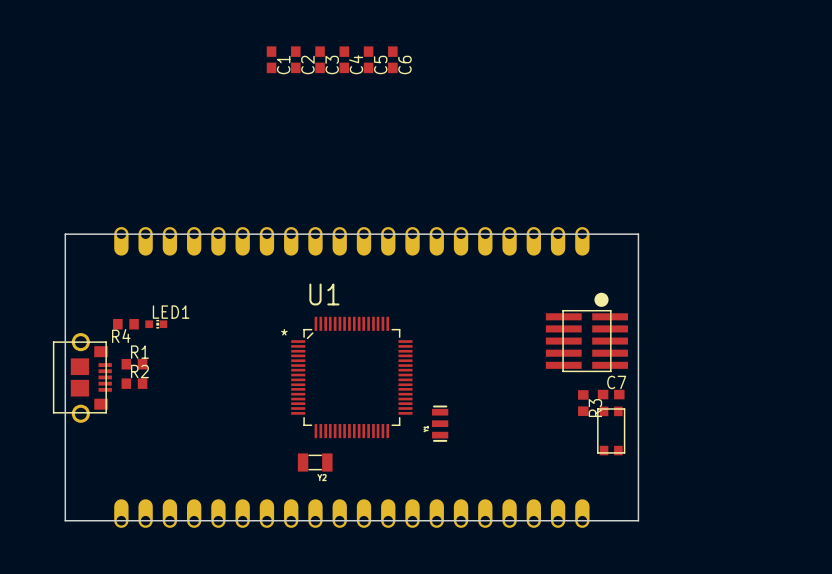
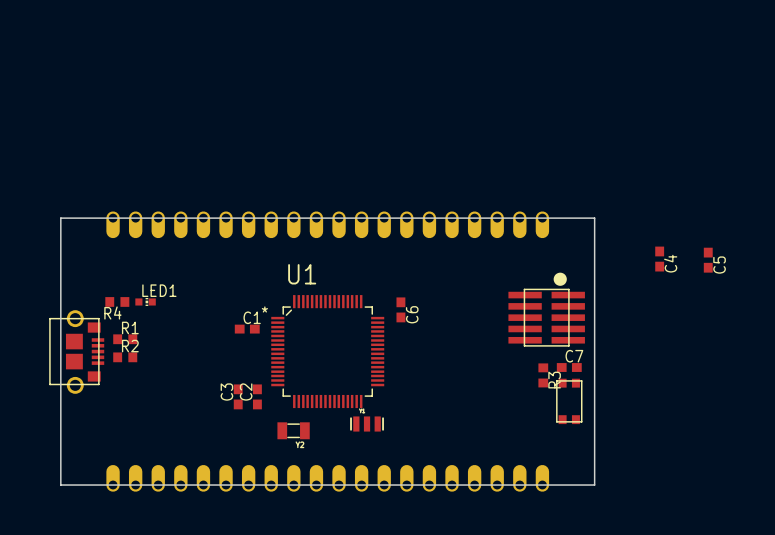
C1 rotation: 0° (271, 59) -> 90° clockwise (247, 329)
C1 position: (271, 59) -> (247, 329)
C2 position: (295, 59) -> (257, 396)
C3 position: (320, 59) -> (238, 396)
C4 position: (344, 59) -> (659, 259)
C5 position: (368, 59) -> (708, 260)
C6 position: (392, 59) -> (400, 309)
C1 name position: C1 (283, 64) -> C1 (252, 317)
C2 name position: C2 (307, 64) -> C2 (246, 392)
C3 name position: C3 (332, 64) -> C3 (226, 392)
part rotation: 0° (440, 423) -> 90° clockwise (367, 424)
part position: (440, 423) -> (367, 424)

